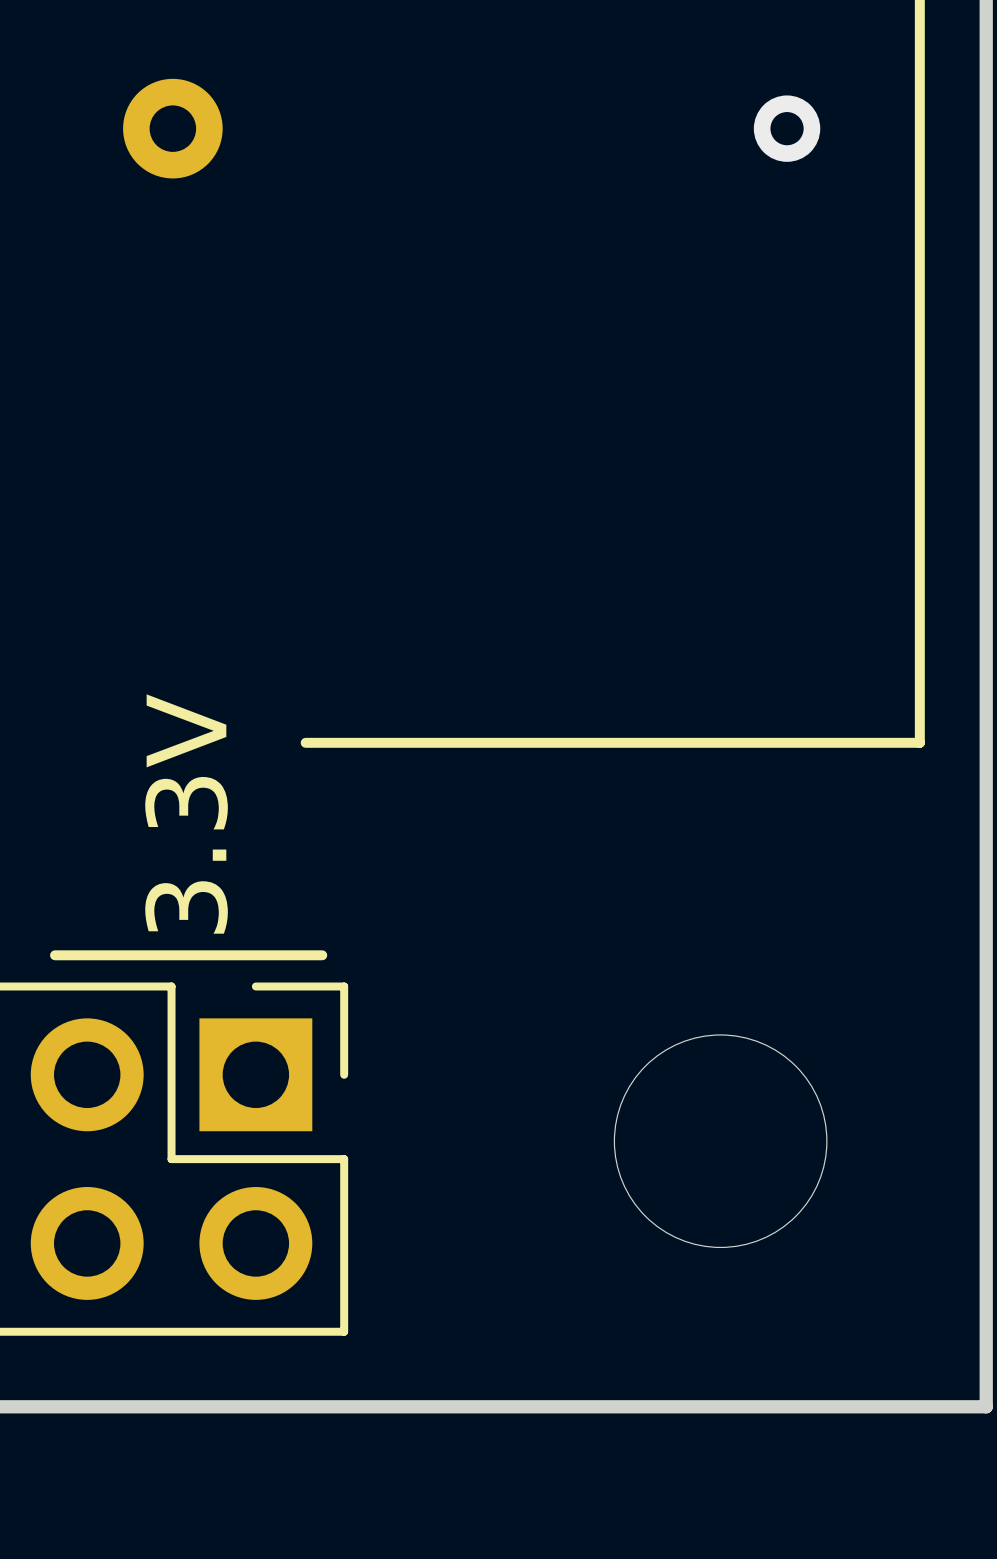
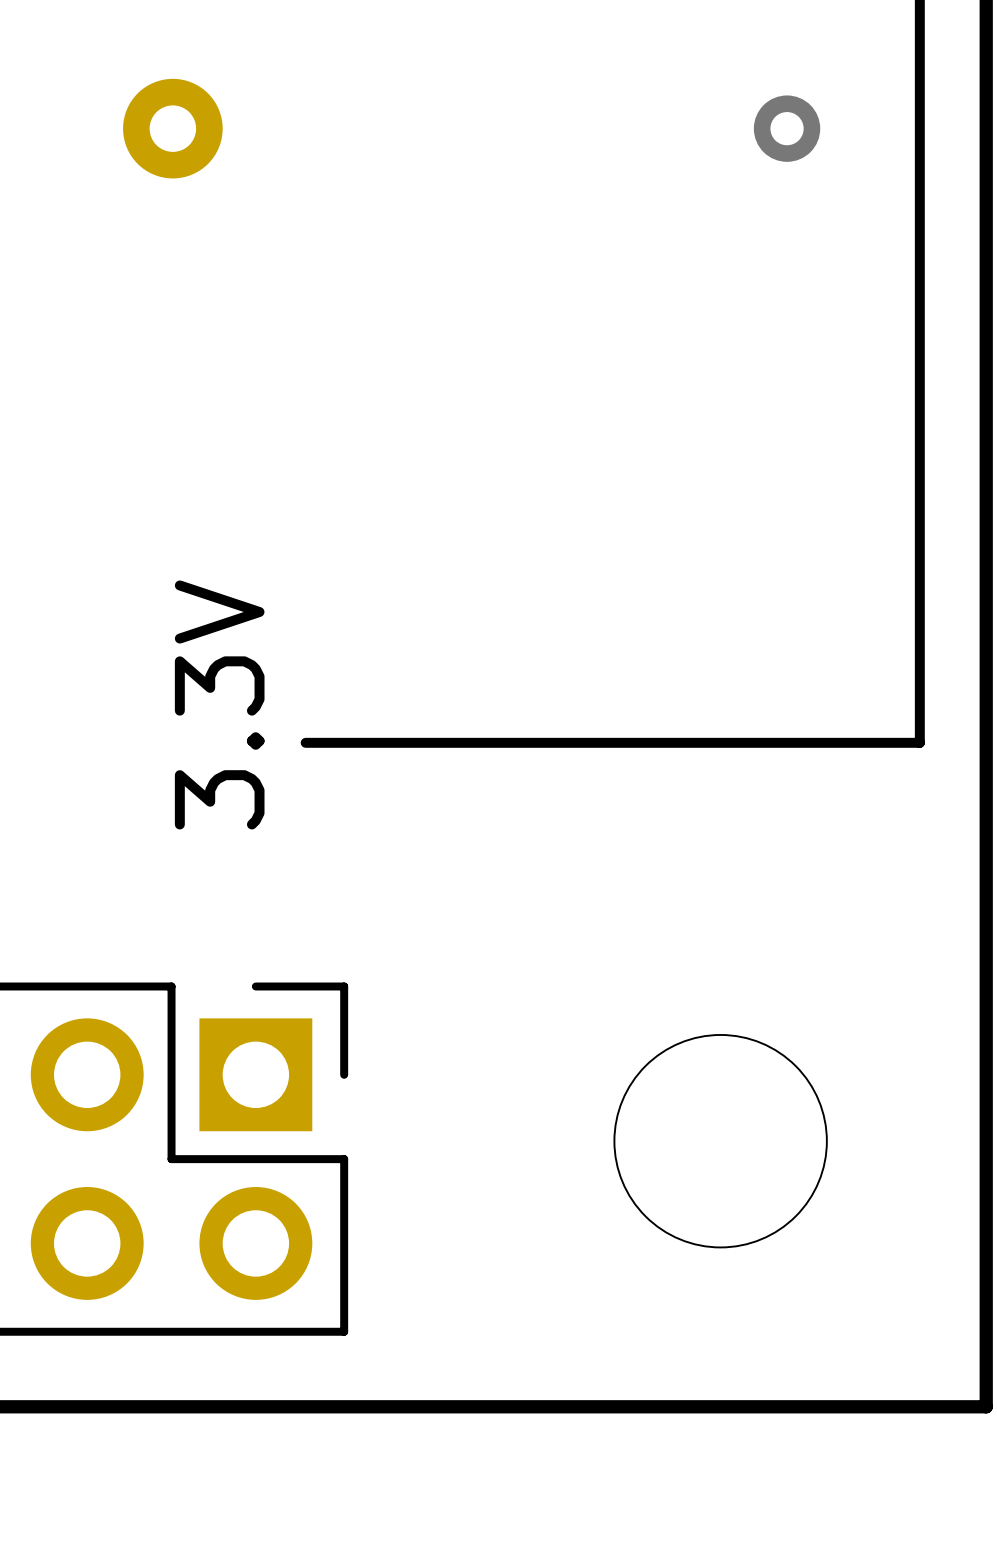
text position: 3.3V (186, 814) -> 3.3V (219, 704)
line: (55, 955) (322, 955) -> none

